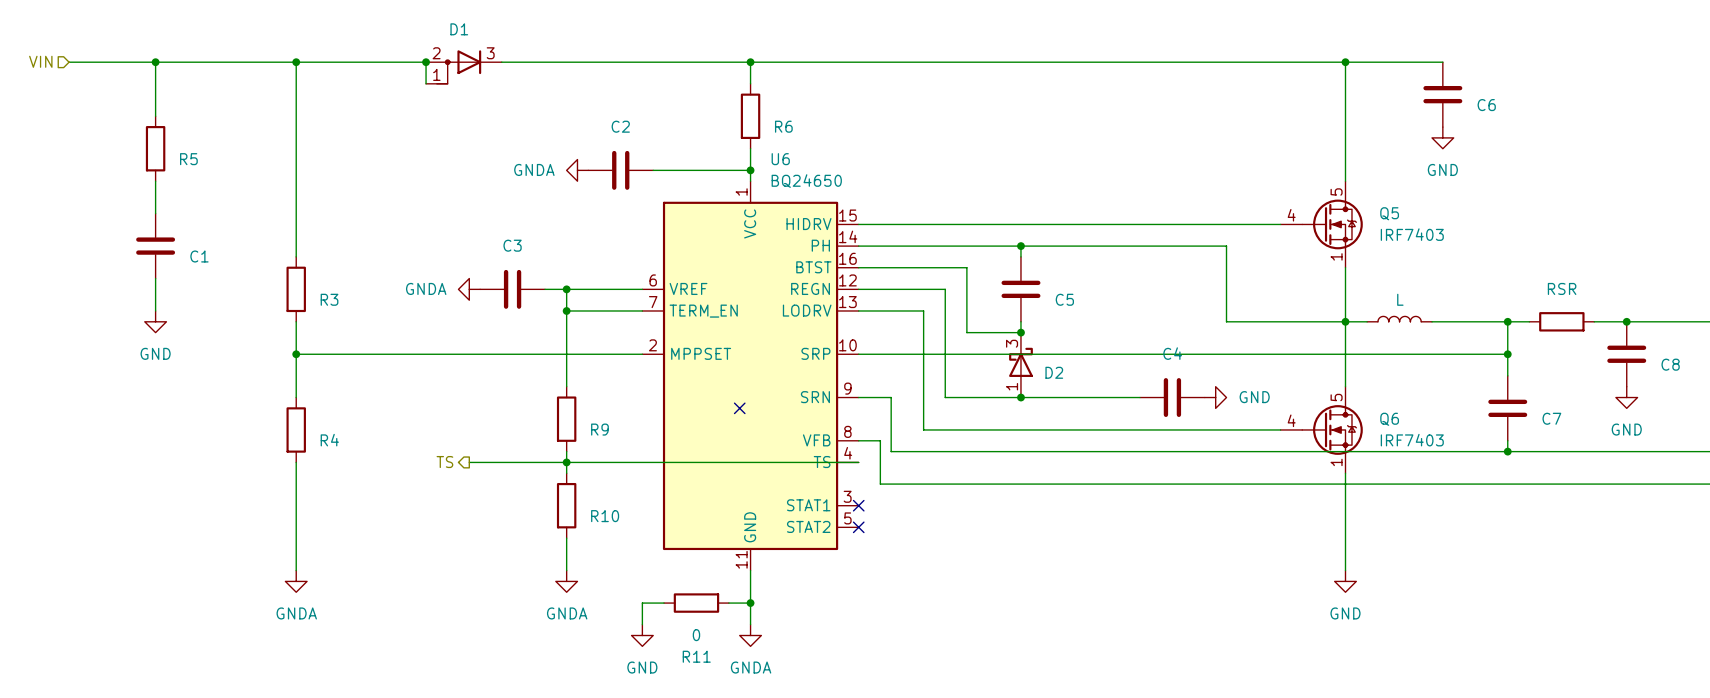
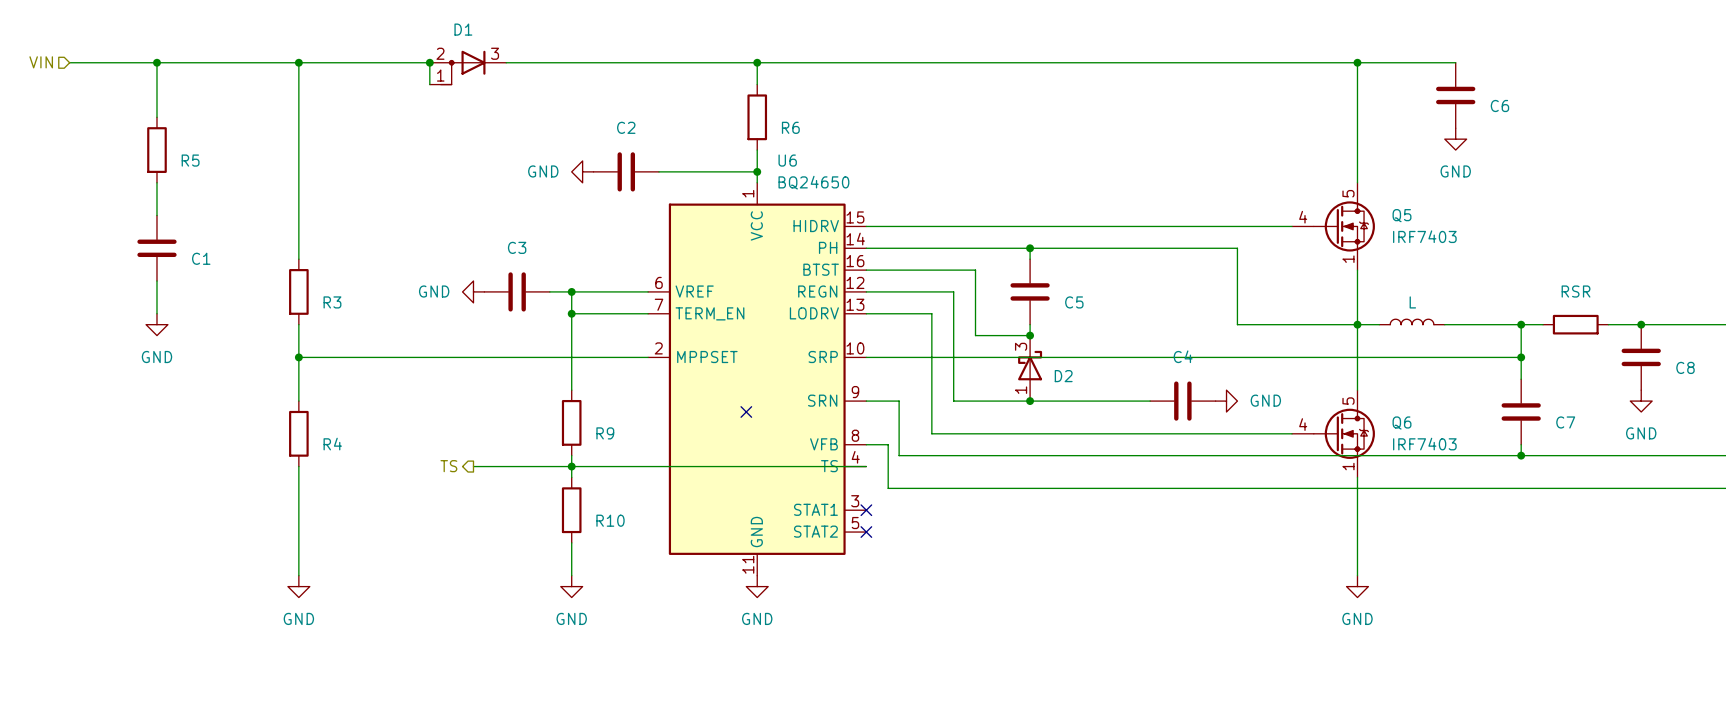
power symbol: GNDA (577, 170) -> GND (582, 171)
power symbol: GNDA (469, 289) -> GND (473, 291)
wire: (750, 570) (750, 624) -> none
power symbol: GNDA (296, 581) -> GND (298, 586)
power symbol: GNDA (566, 581) -> GND (571, 586)
wire: (664, 603) (642, 603) (642, 624) -> none
R11: 0 (696, 603) -> none
wire: (728, 603) (750, 603) -> none
junction: (750, 603) -> none
power symbol position: GND (642, 635) -> GND (757, 586)
power symbol: GNDA (750, 635) -> none

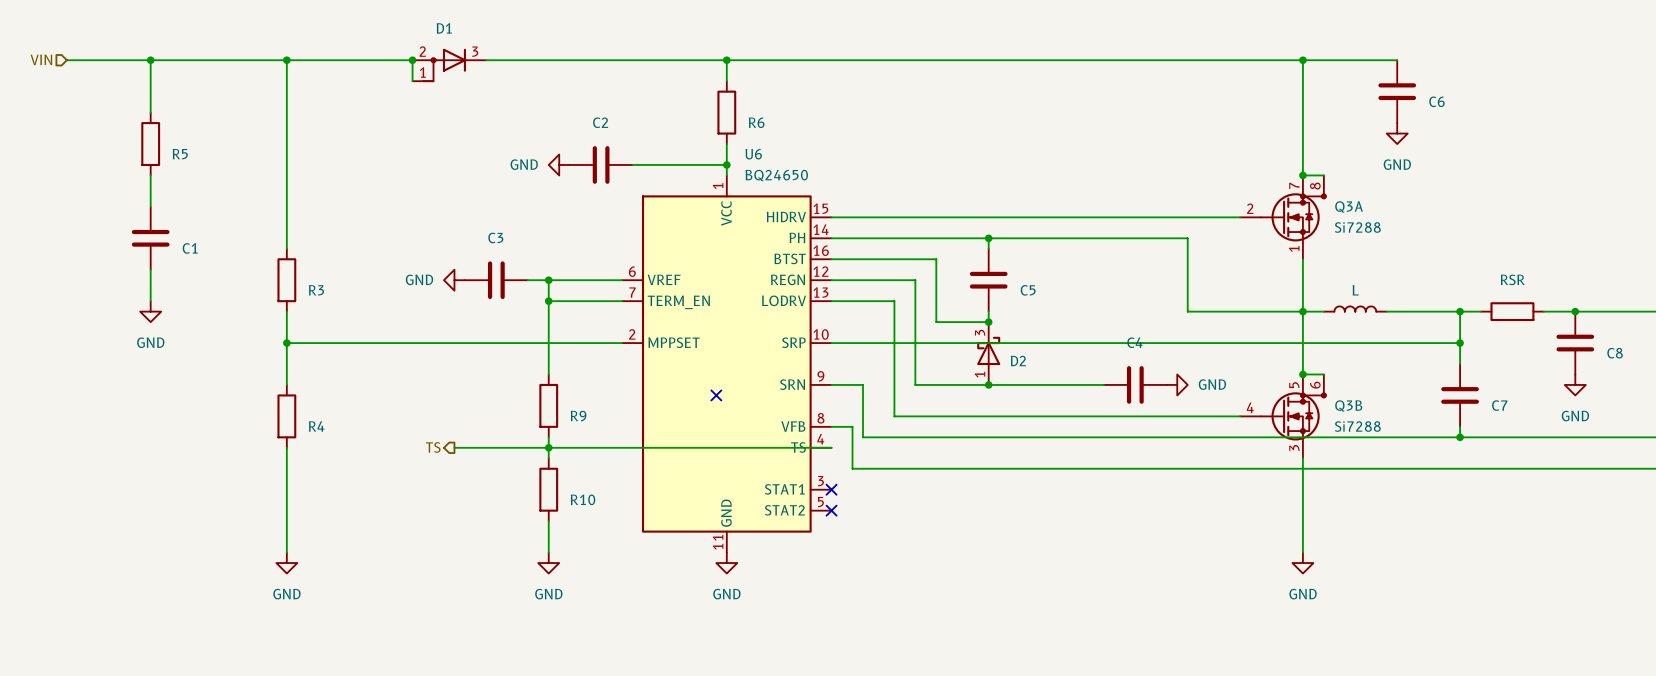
wire: none -> (1302, 175) (1323, 175)
junction: none -> (1302, 175)
Q5: IRF7403 (1333, 226) -> none
Q3A: none -> Si7288 (1283, 217)
wire: none -> (1302, 374) (1323, 374)
junction: none -> (1302, 374)
Q6: IRF7403 (1333, 433) -> none
Q3B: none -> Si7288 (1283, 416)

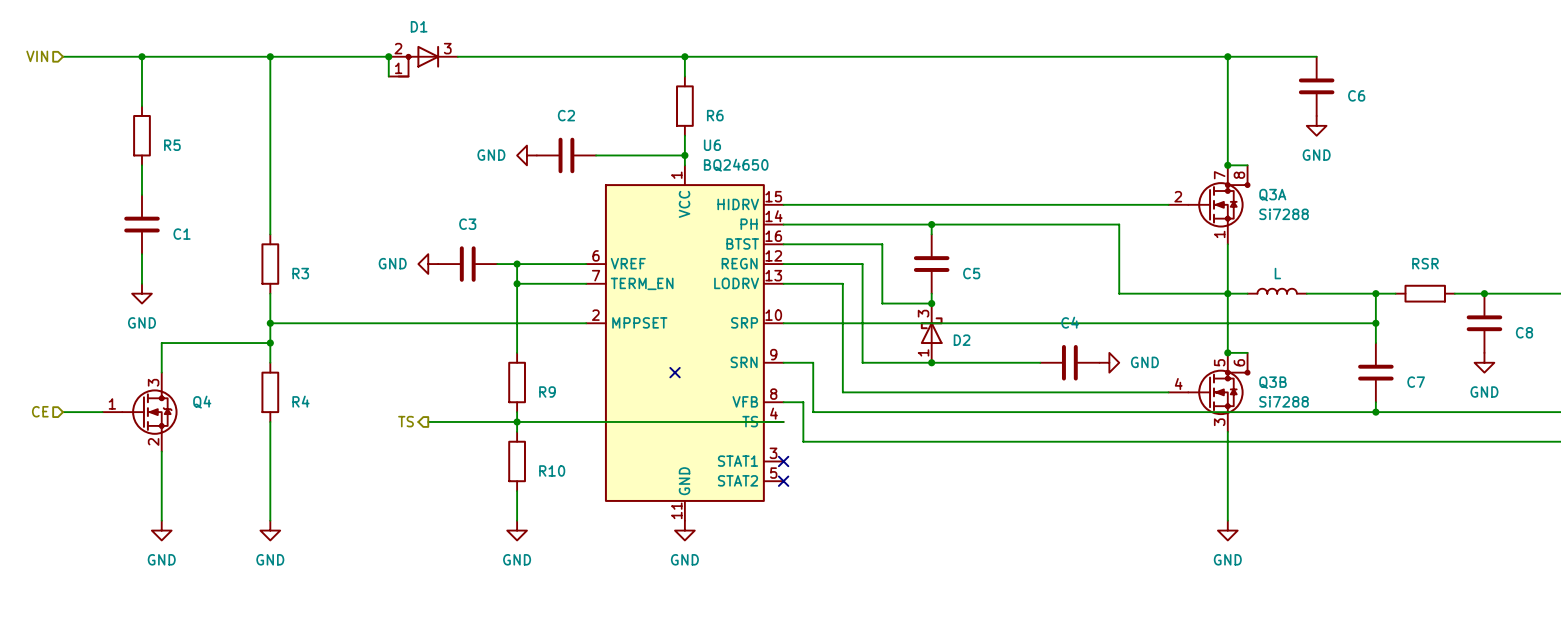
wire: none -> (270, 343) (161, 343) (161, 372)
junction: none -> (270, 343)
hierarchical label: none -> CE (40, 411)
wire: none -> (63, 412) (102, 412)
Q4: none -> (140, 412)
wire: none -> (161, 451) (161, 520)
power symbol: none -> GND (161, 530)

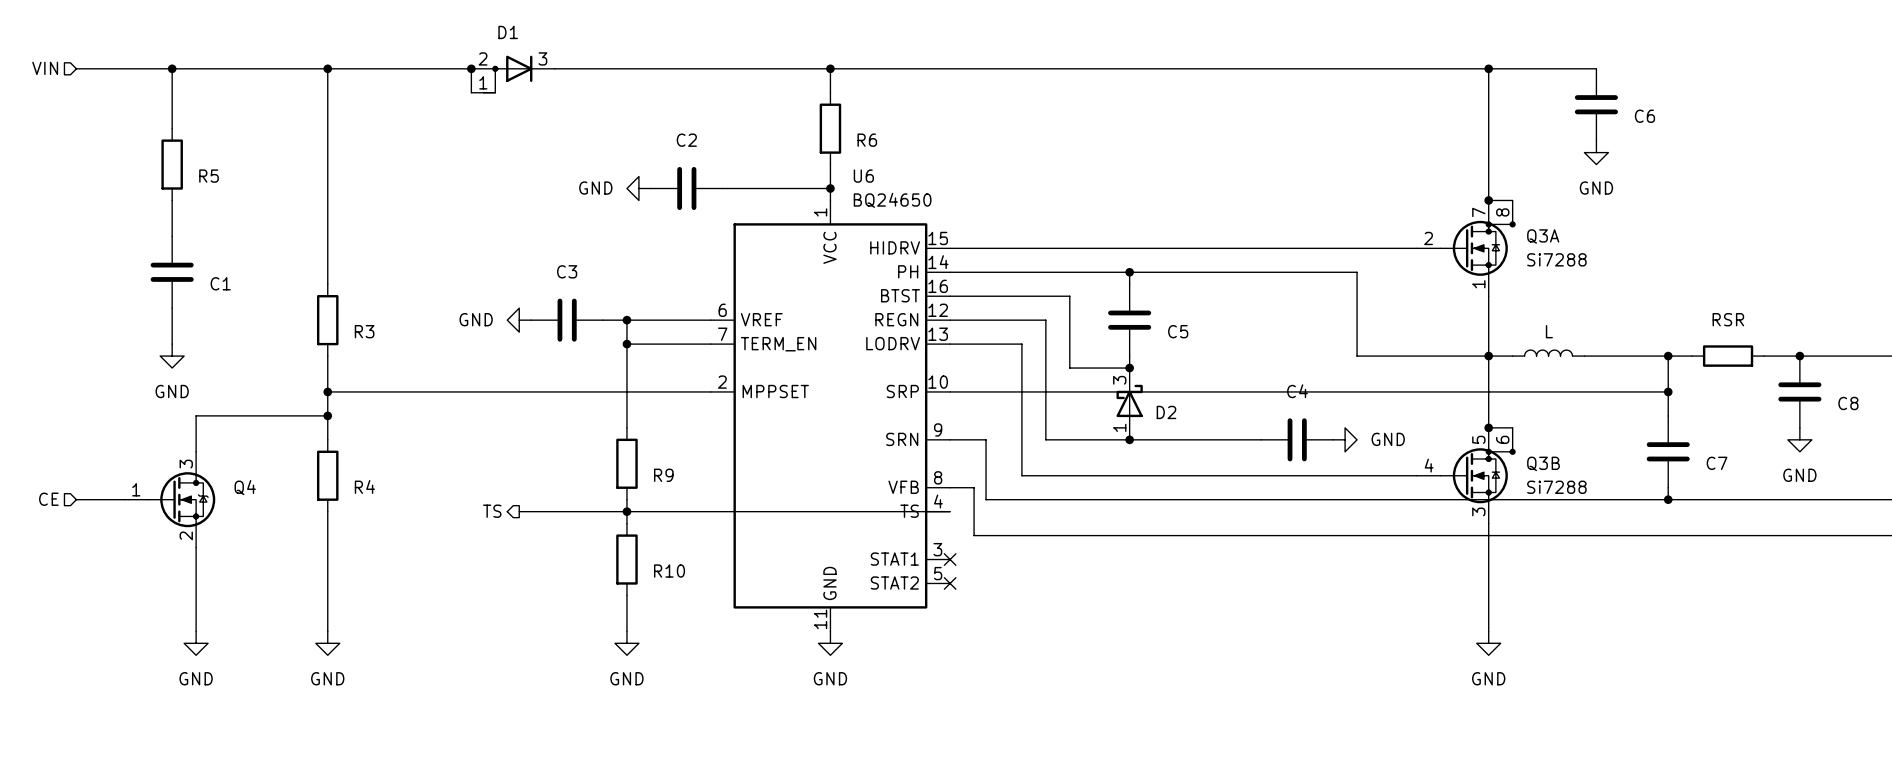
no-connect mark: (675, 372) -> none

